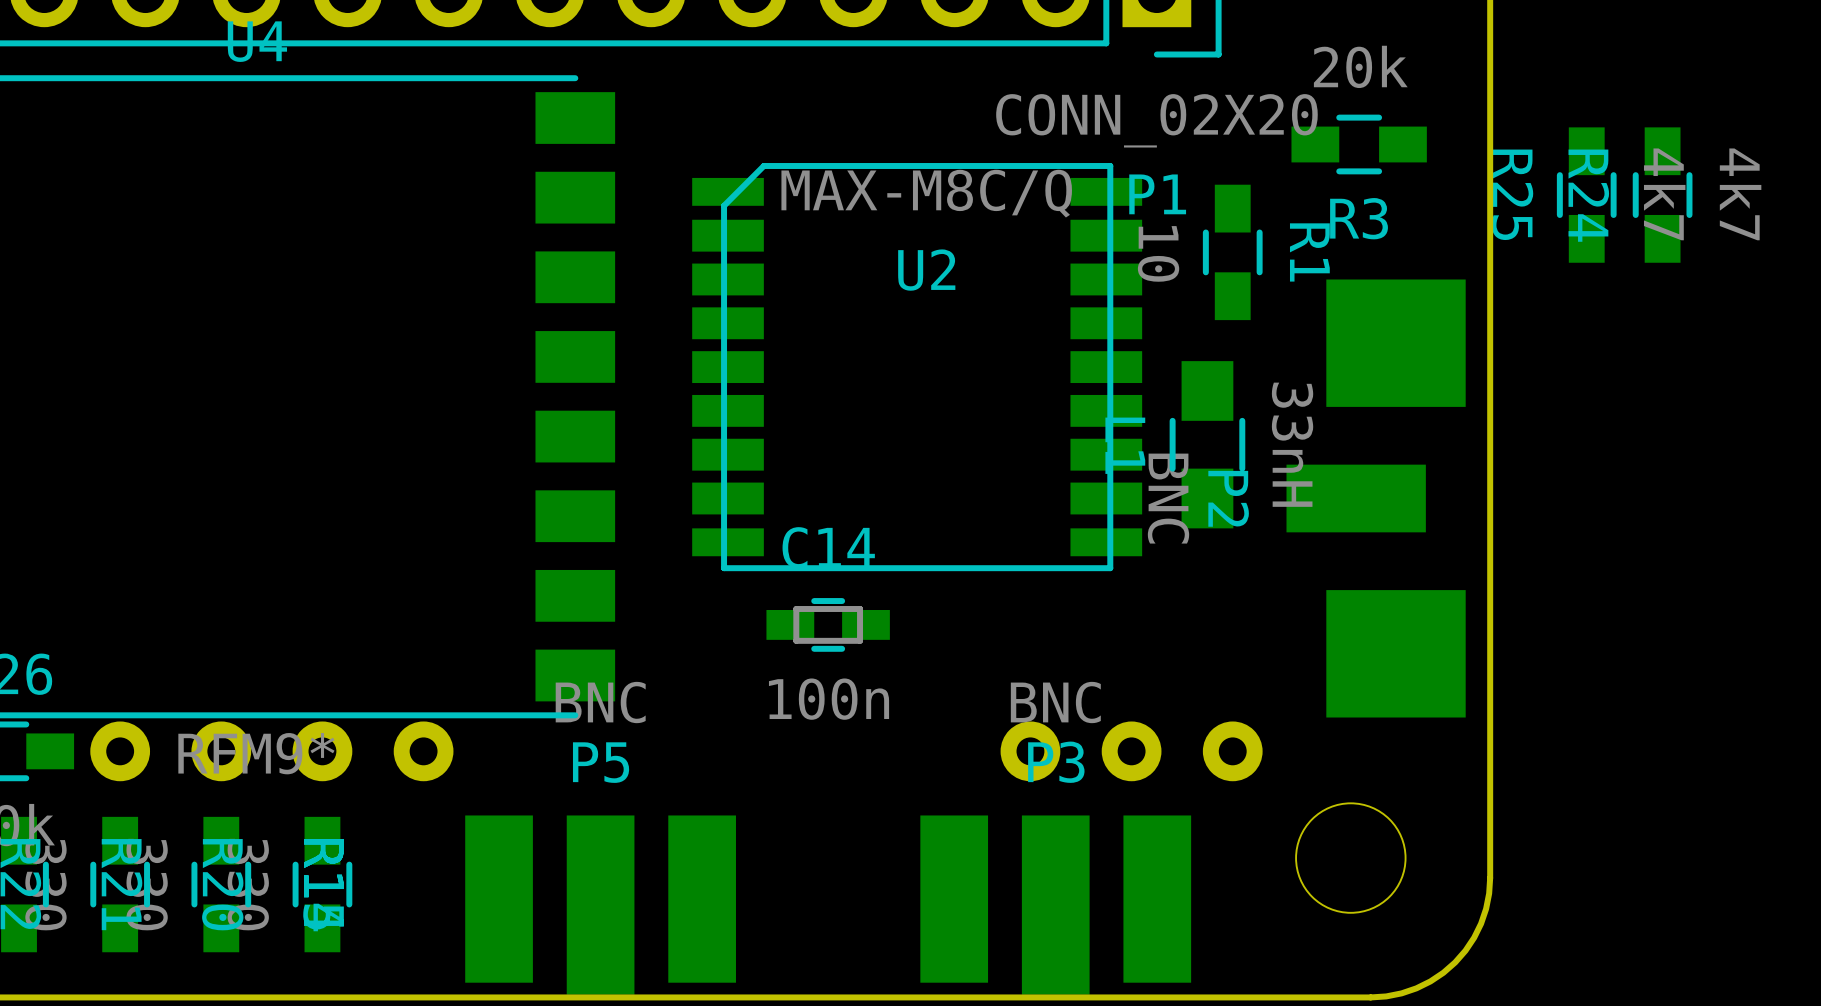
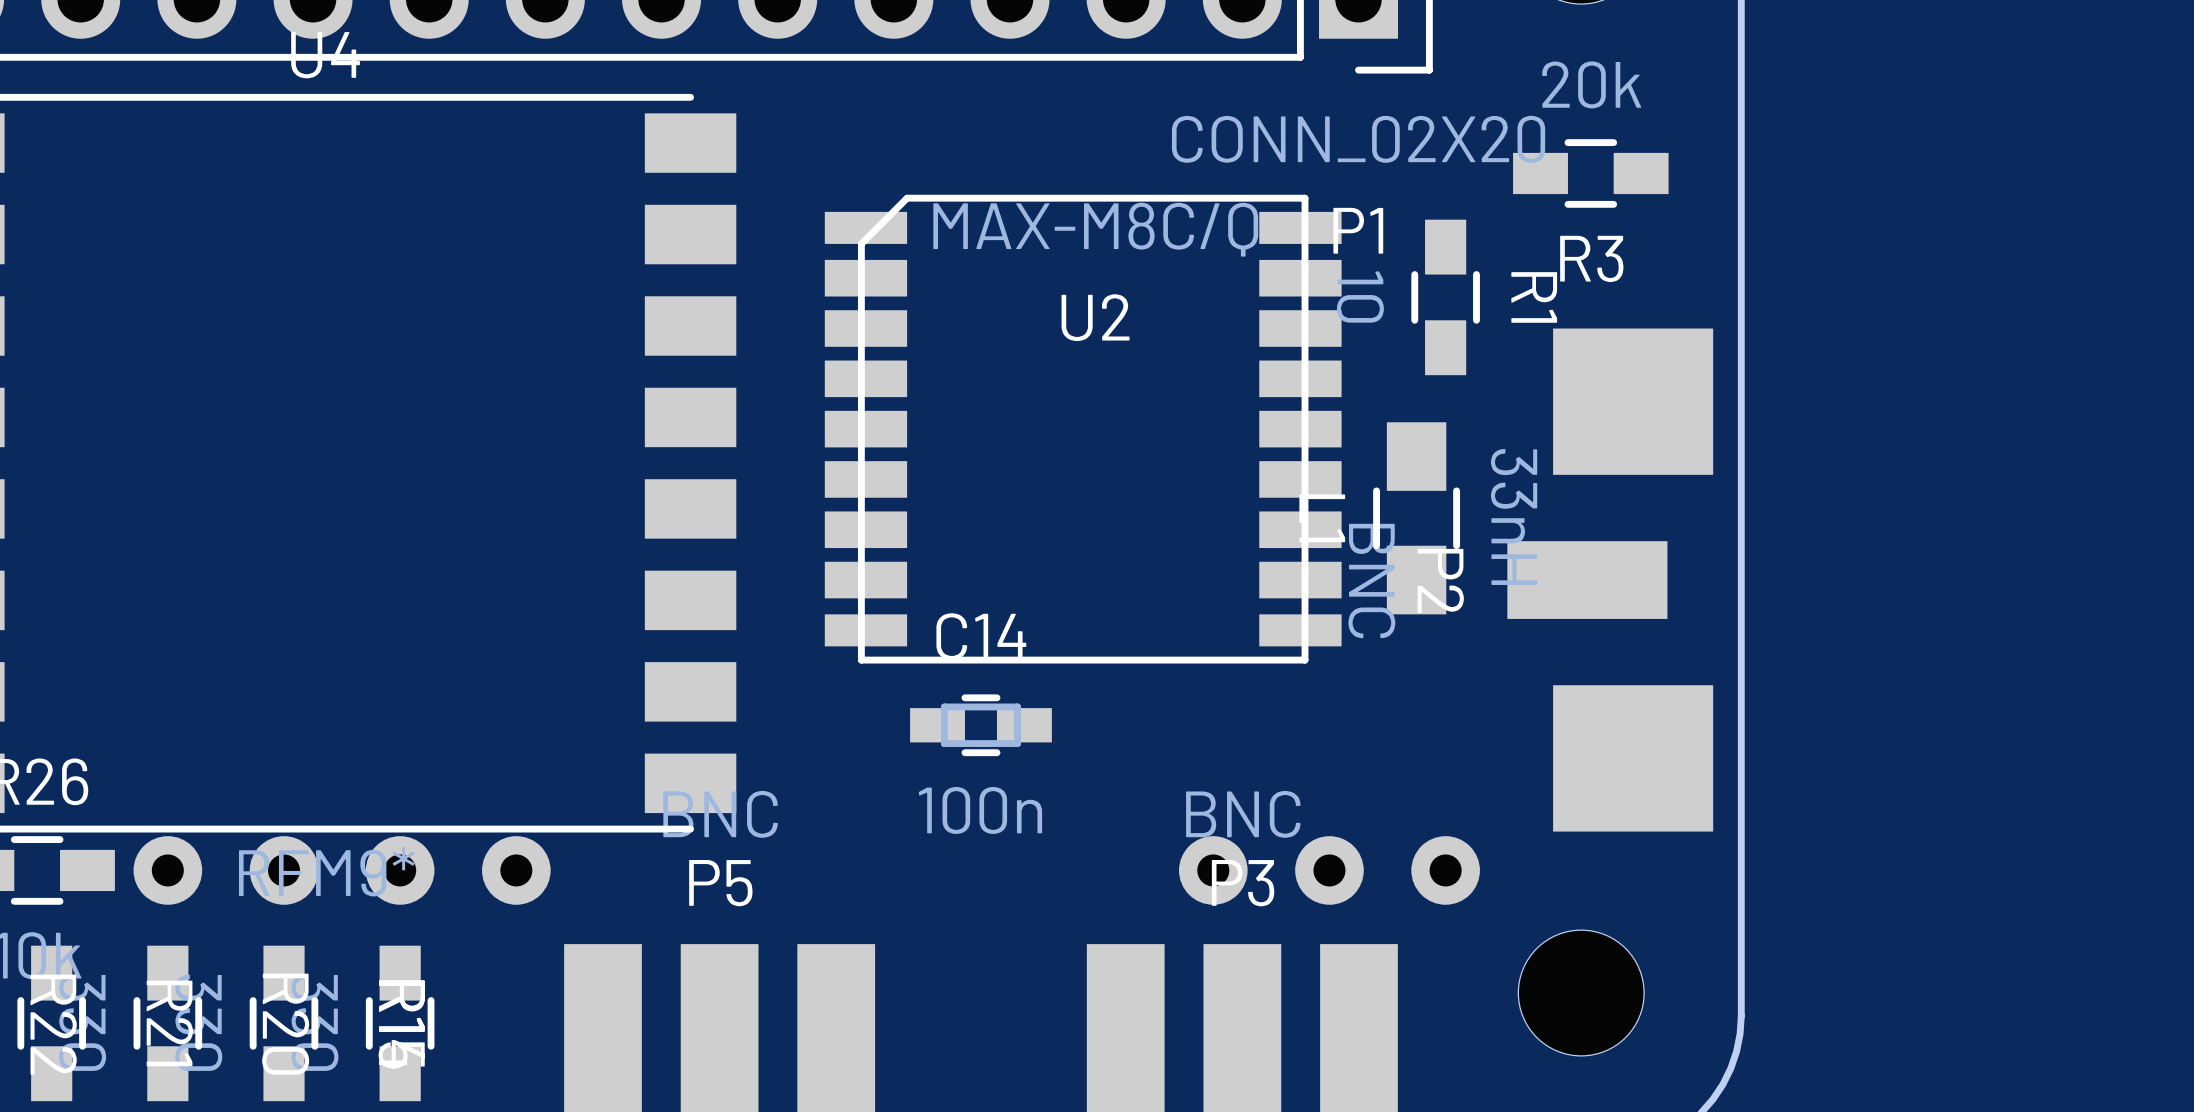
R25: 4k7 (1586, 195) -> none
R24: 4k7 (1662, 195) -> none

